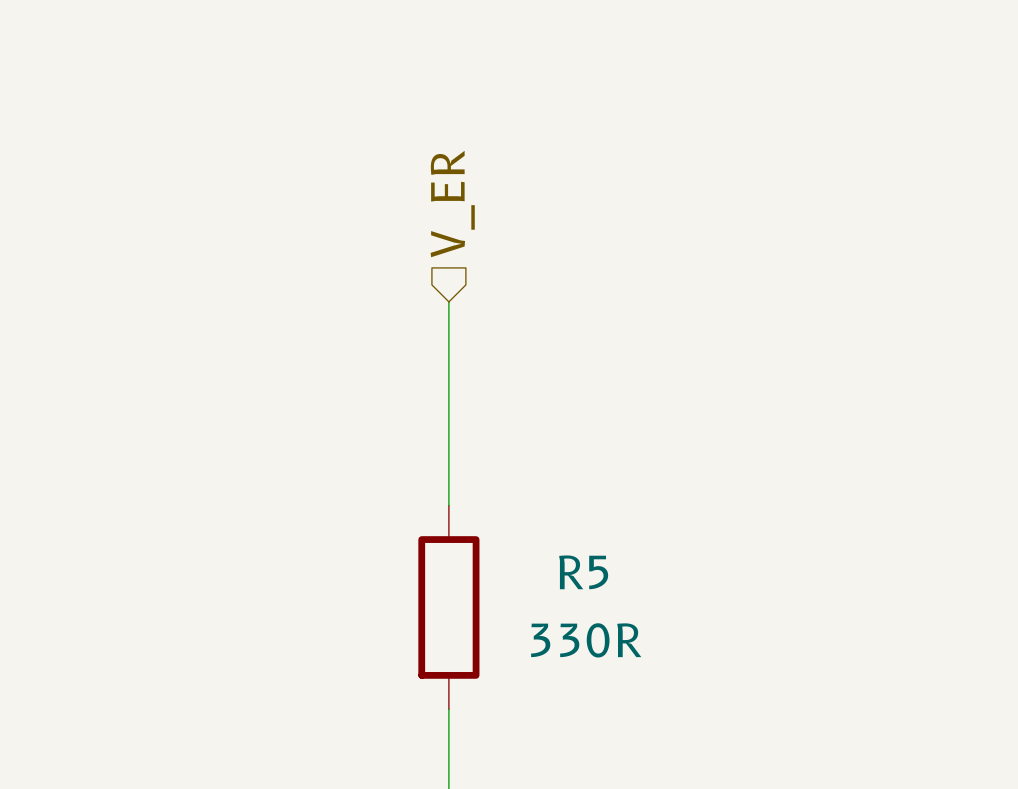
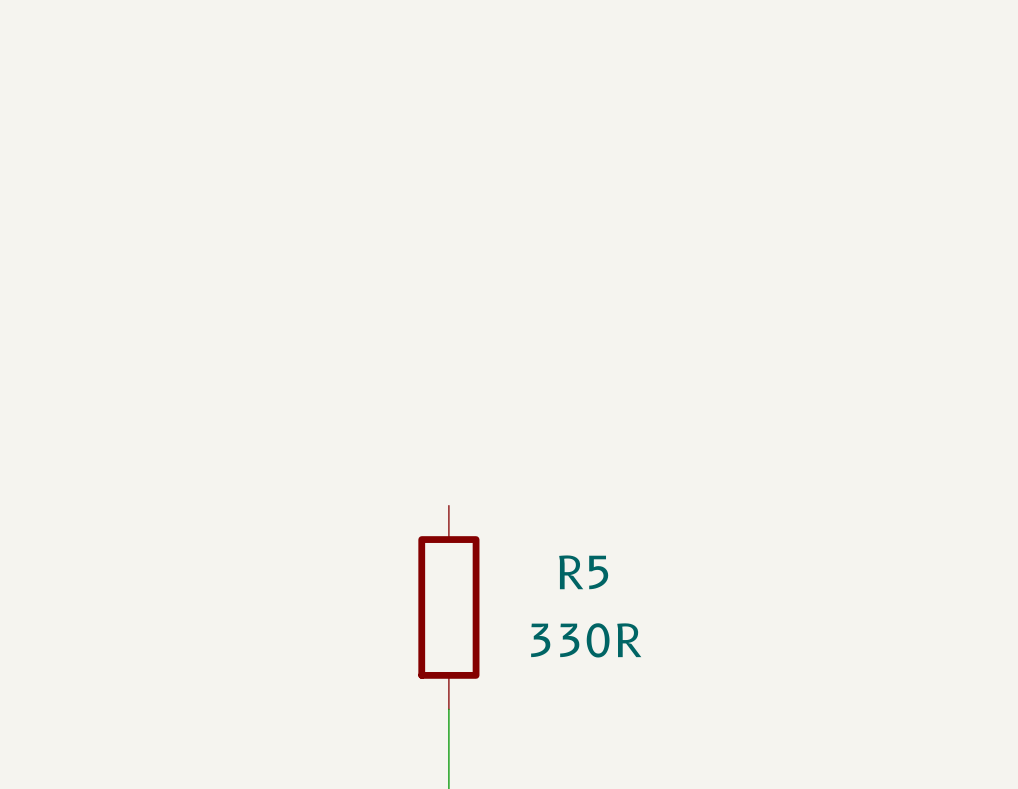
hierarchical label: V_ER (452, 204) -> none
wire: (448, 301) (448, 505) -> none

